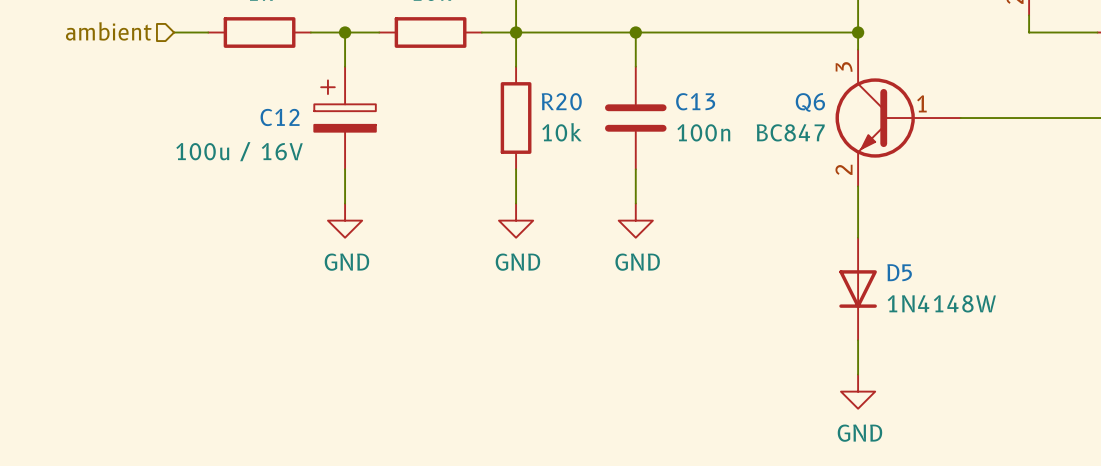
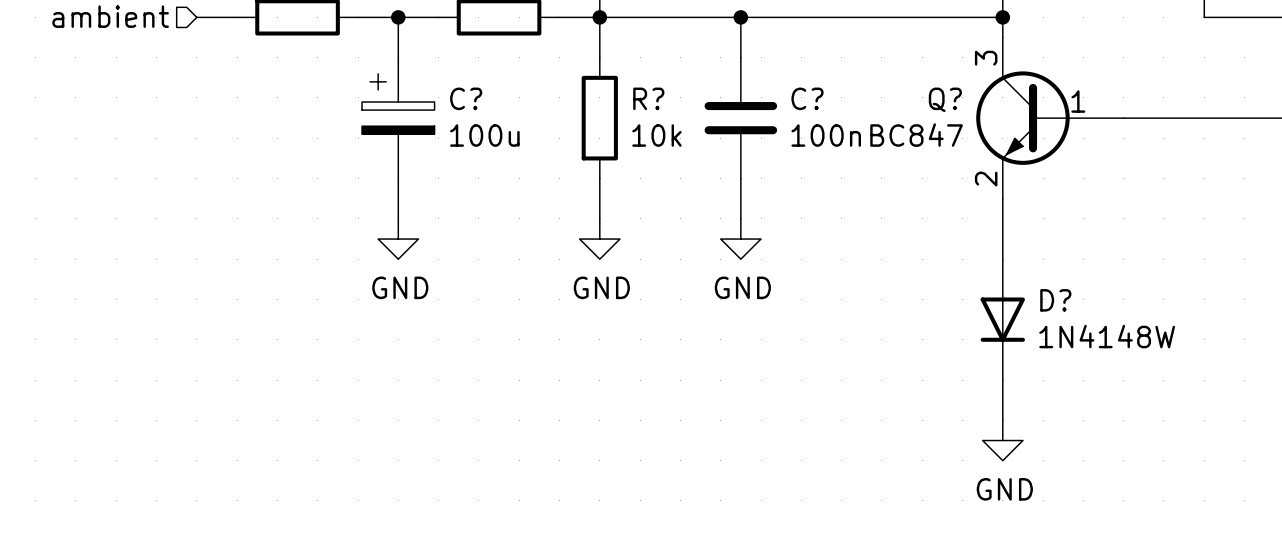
R20 name: R20 (561, 101) -> R? (648, 98)
C13 name: C13 (695, 101) -> C? (807, 98)
Q6 name: Q6 (810, 102) -> Q? (945, 99)
C12 name: C12 (280, 117) -> C? (466, 98)
C12 value: 100u / 16V (239, 151) -> 100u (484, 135)
D5 name: D5 (899, 272) -> D? (1055, 300)

